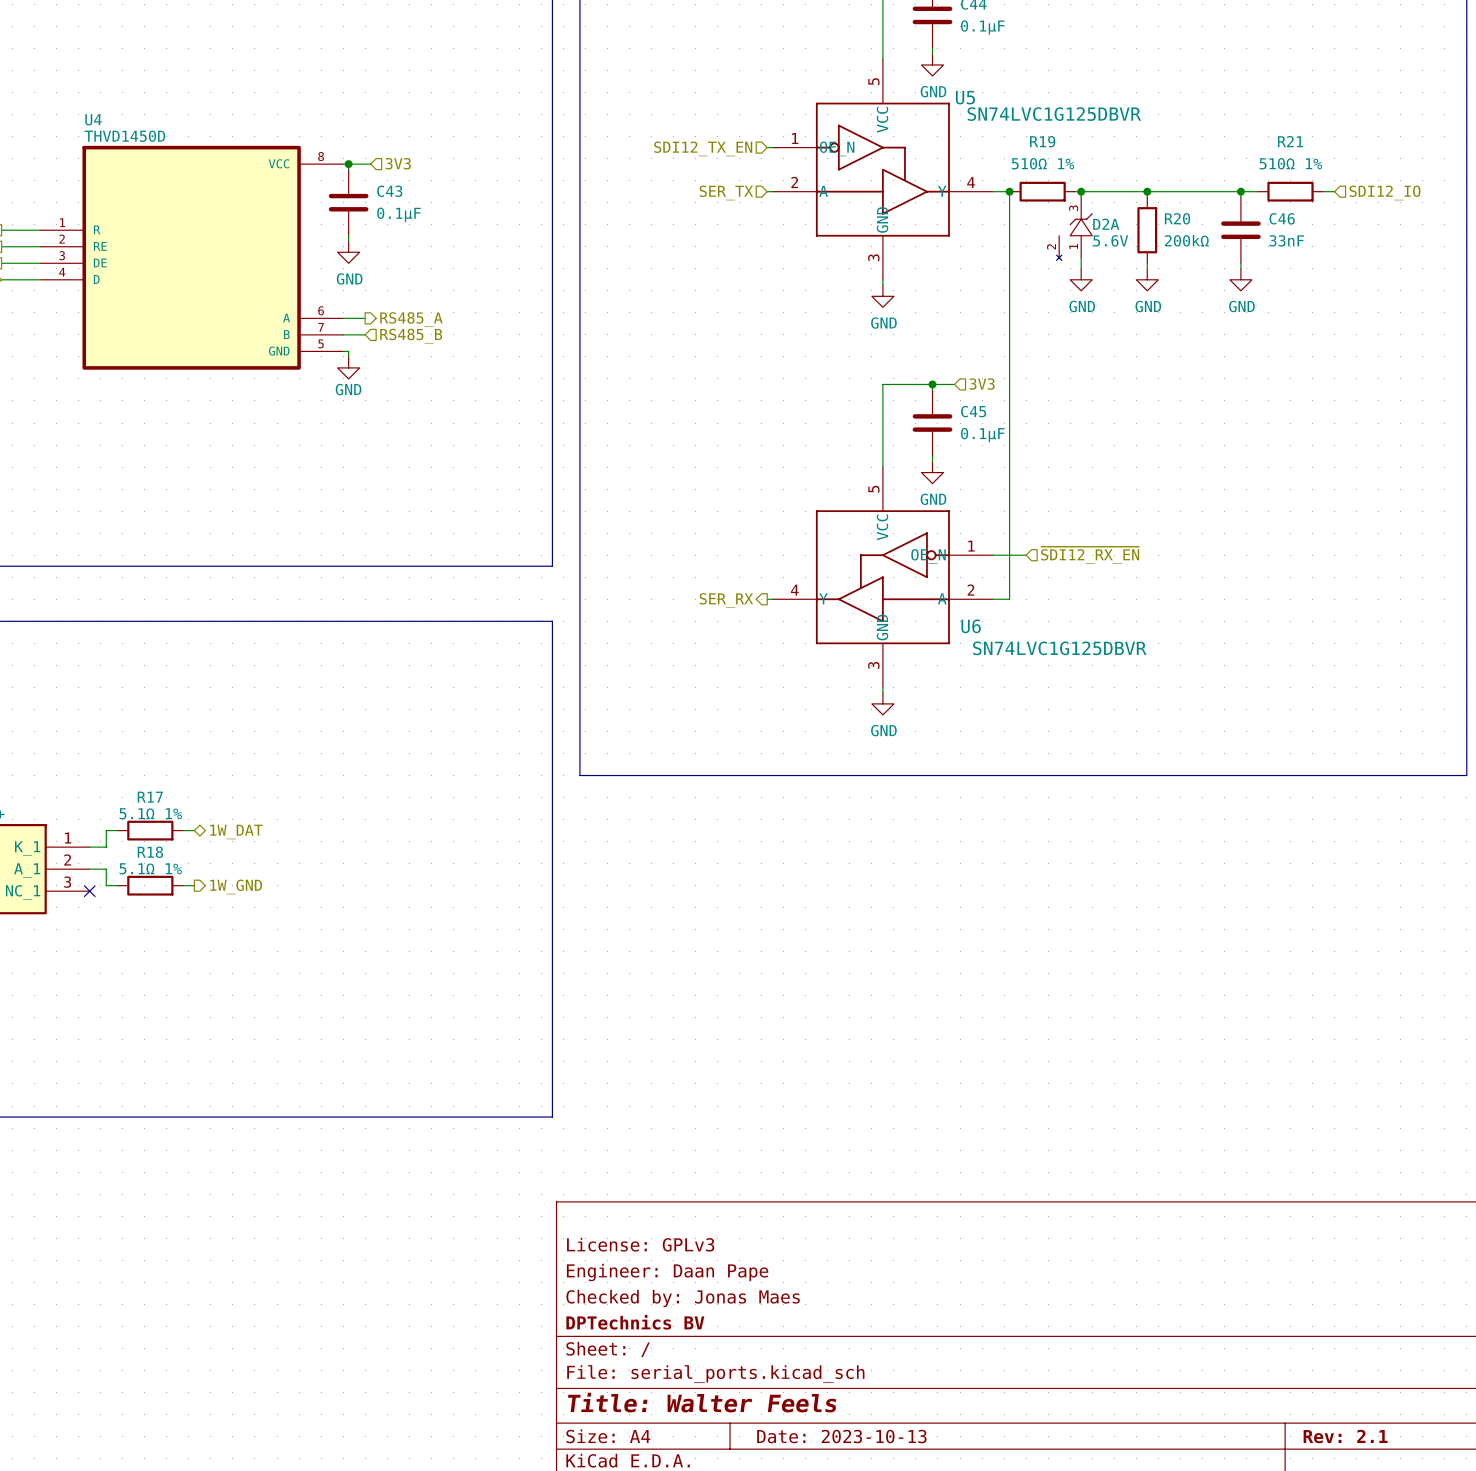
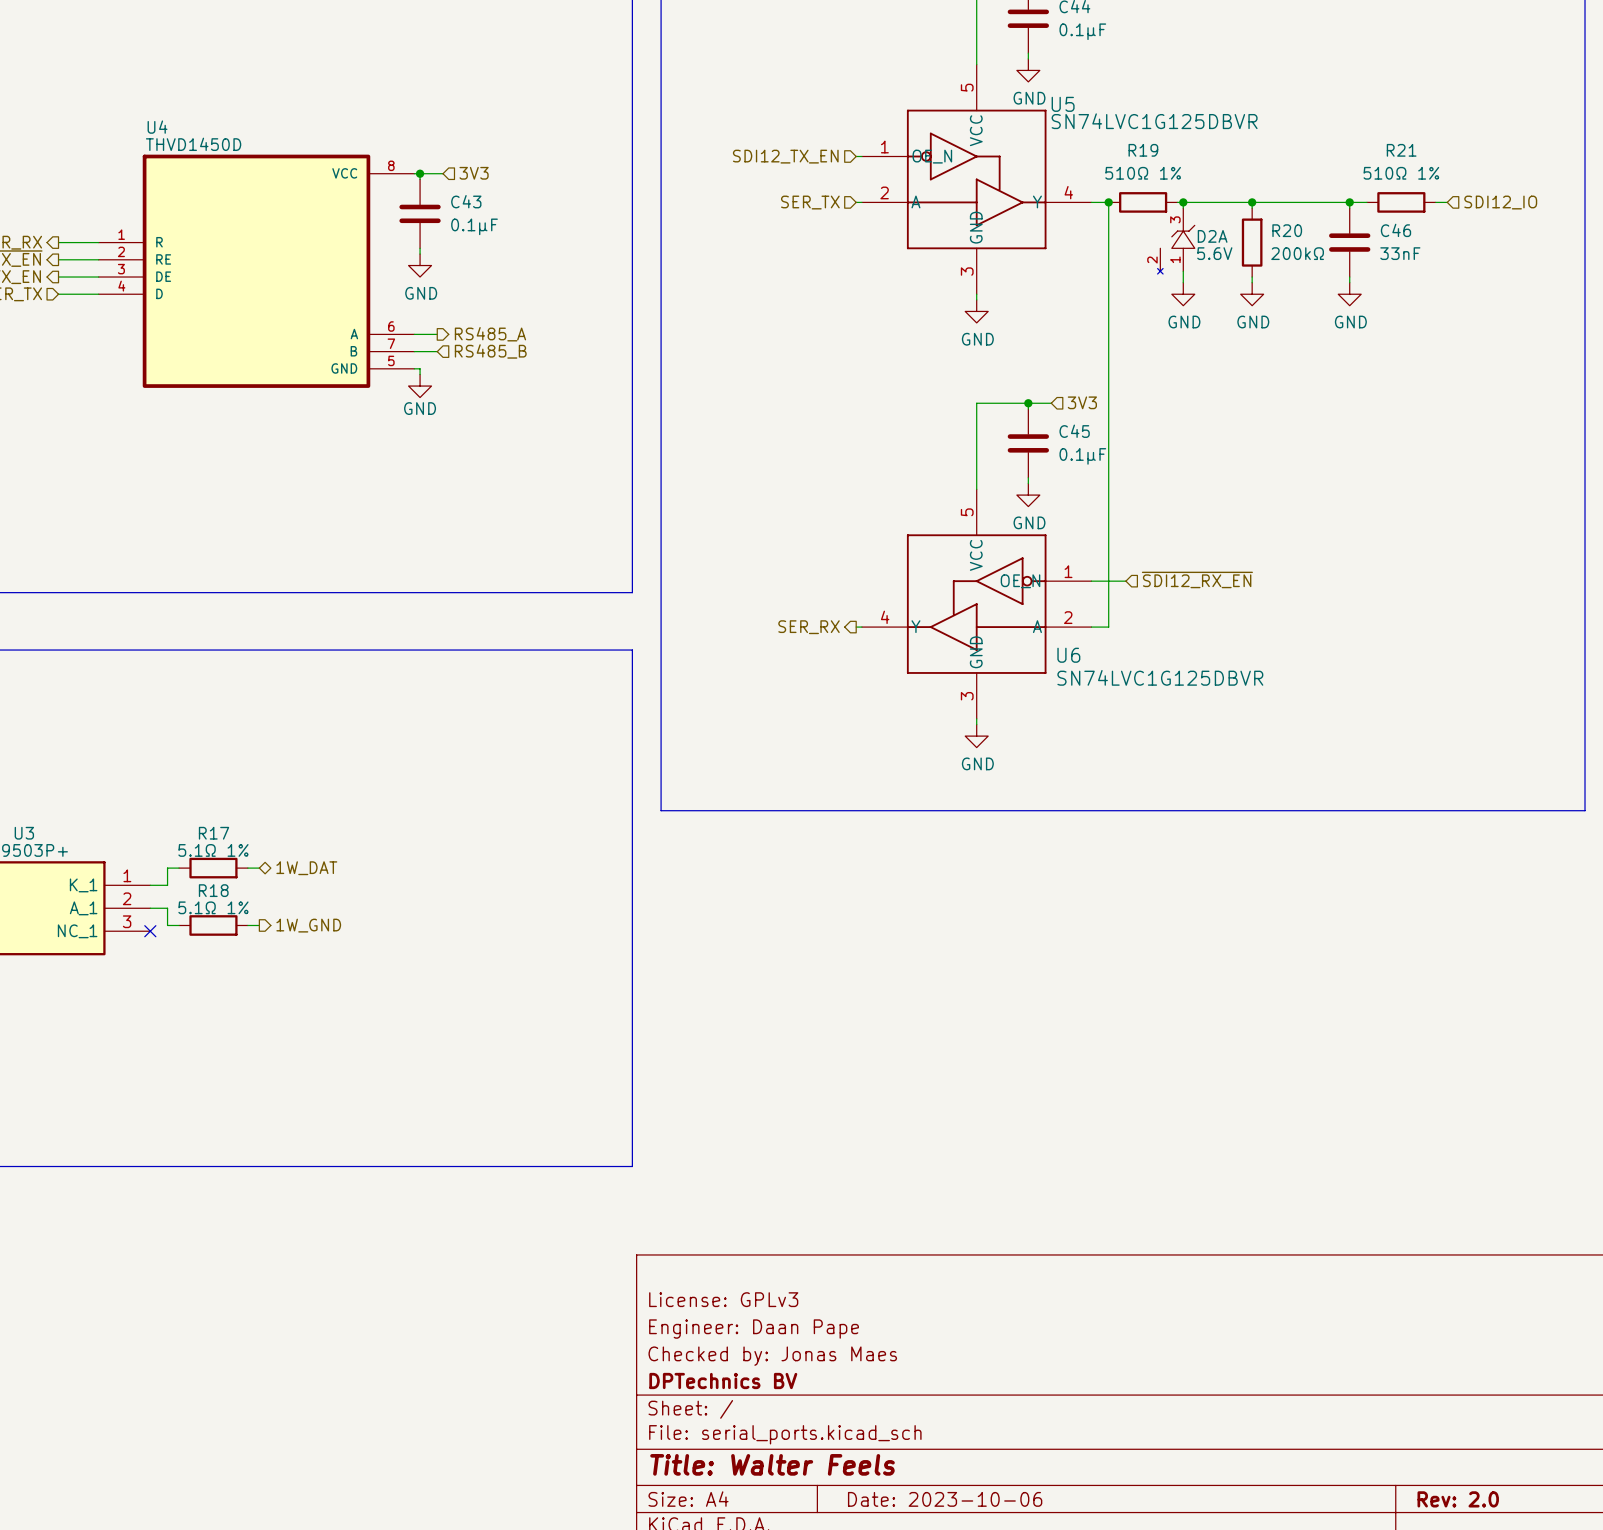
title block: Date: 2023-10-13 (841, 1436) -> Date: 2023-10-06 (945, 1499)
title block: Rev: 2.1 (1345, 1436) -> Rev: 2.0 (1458, 1499)

